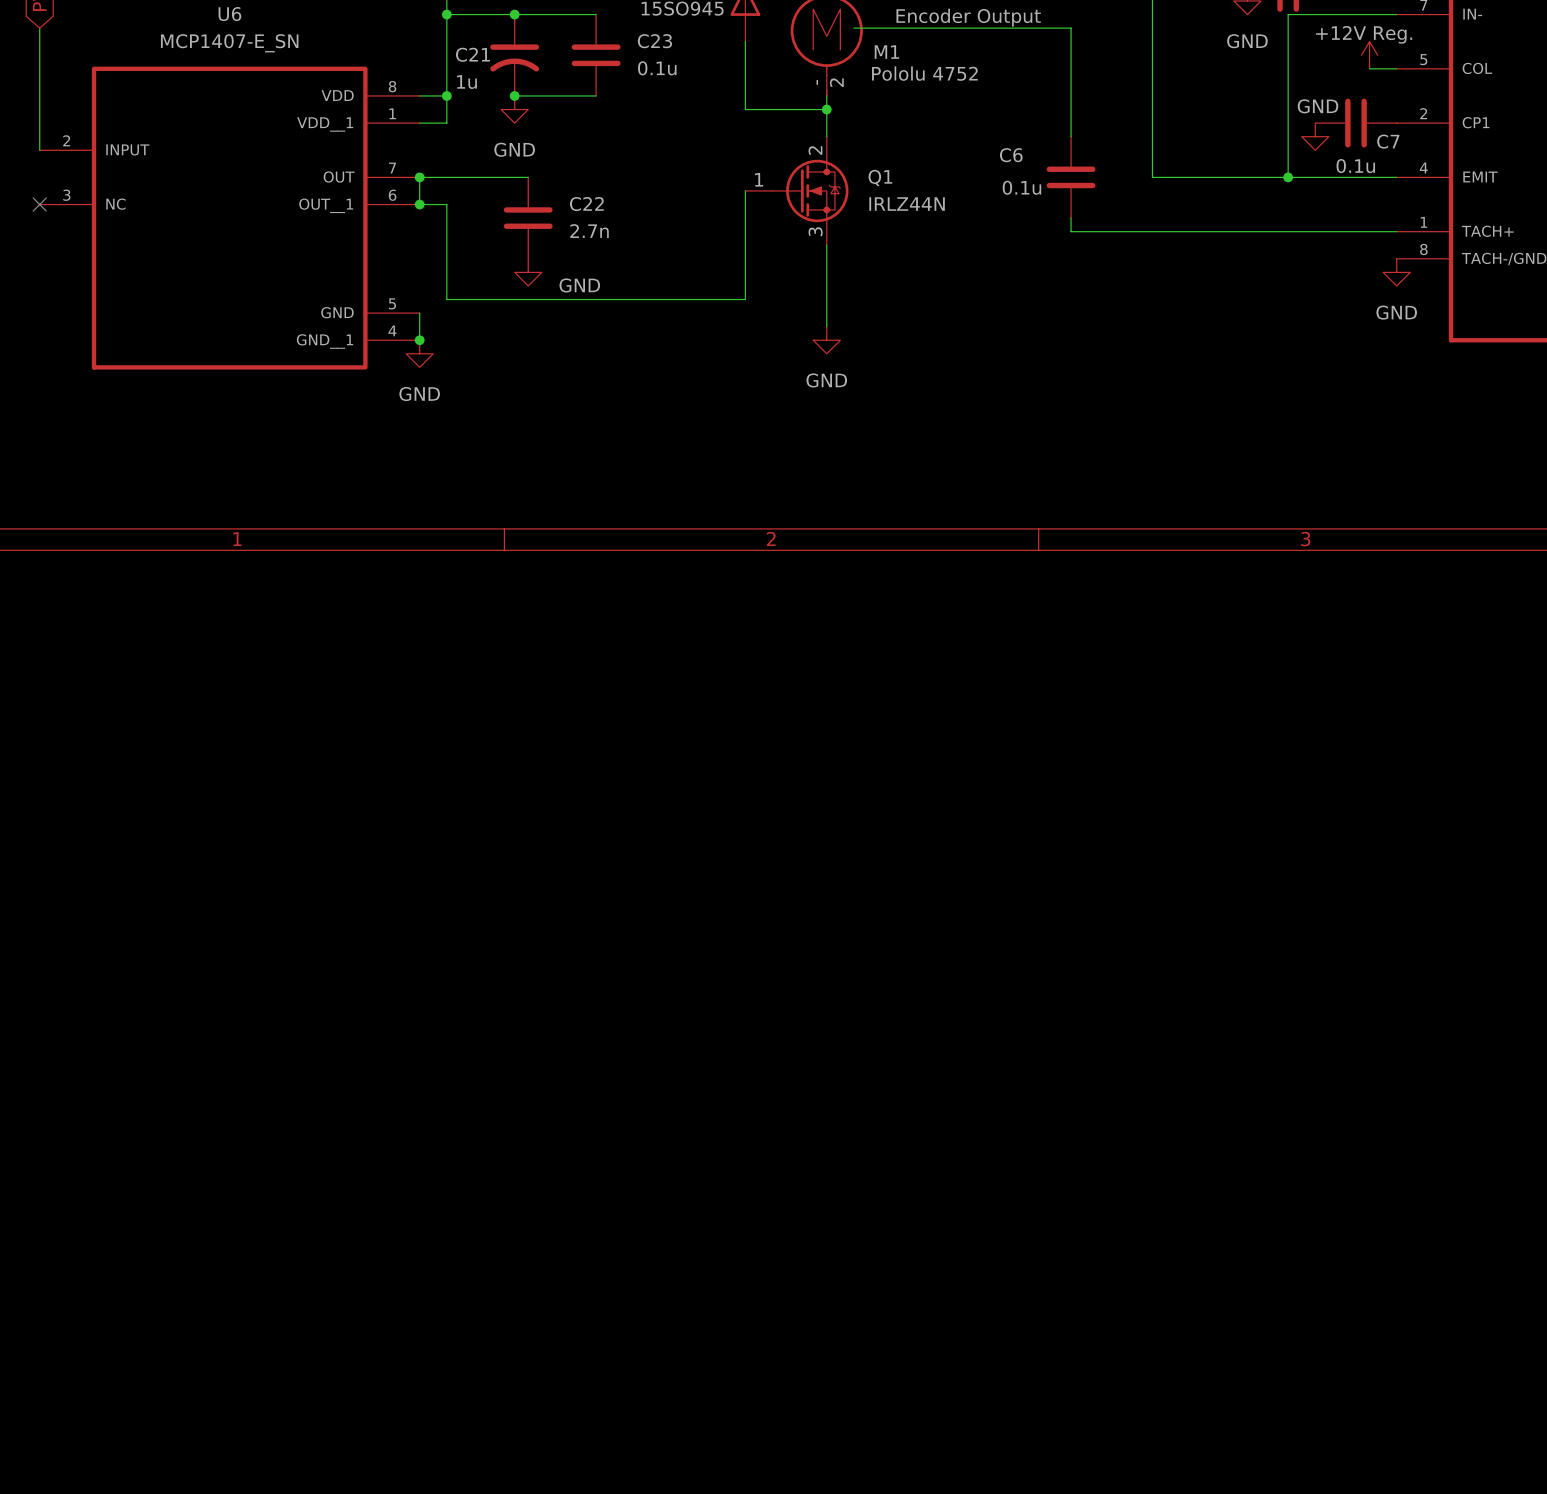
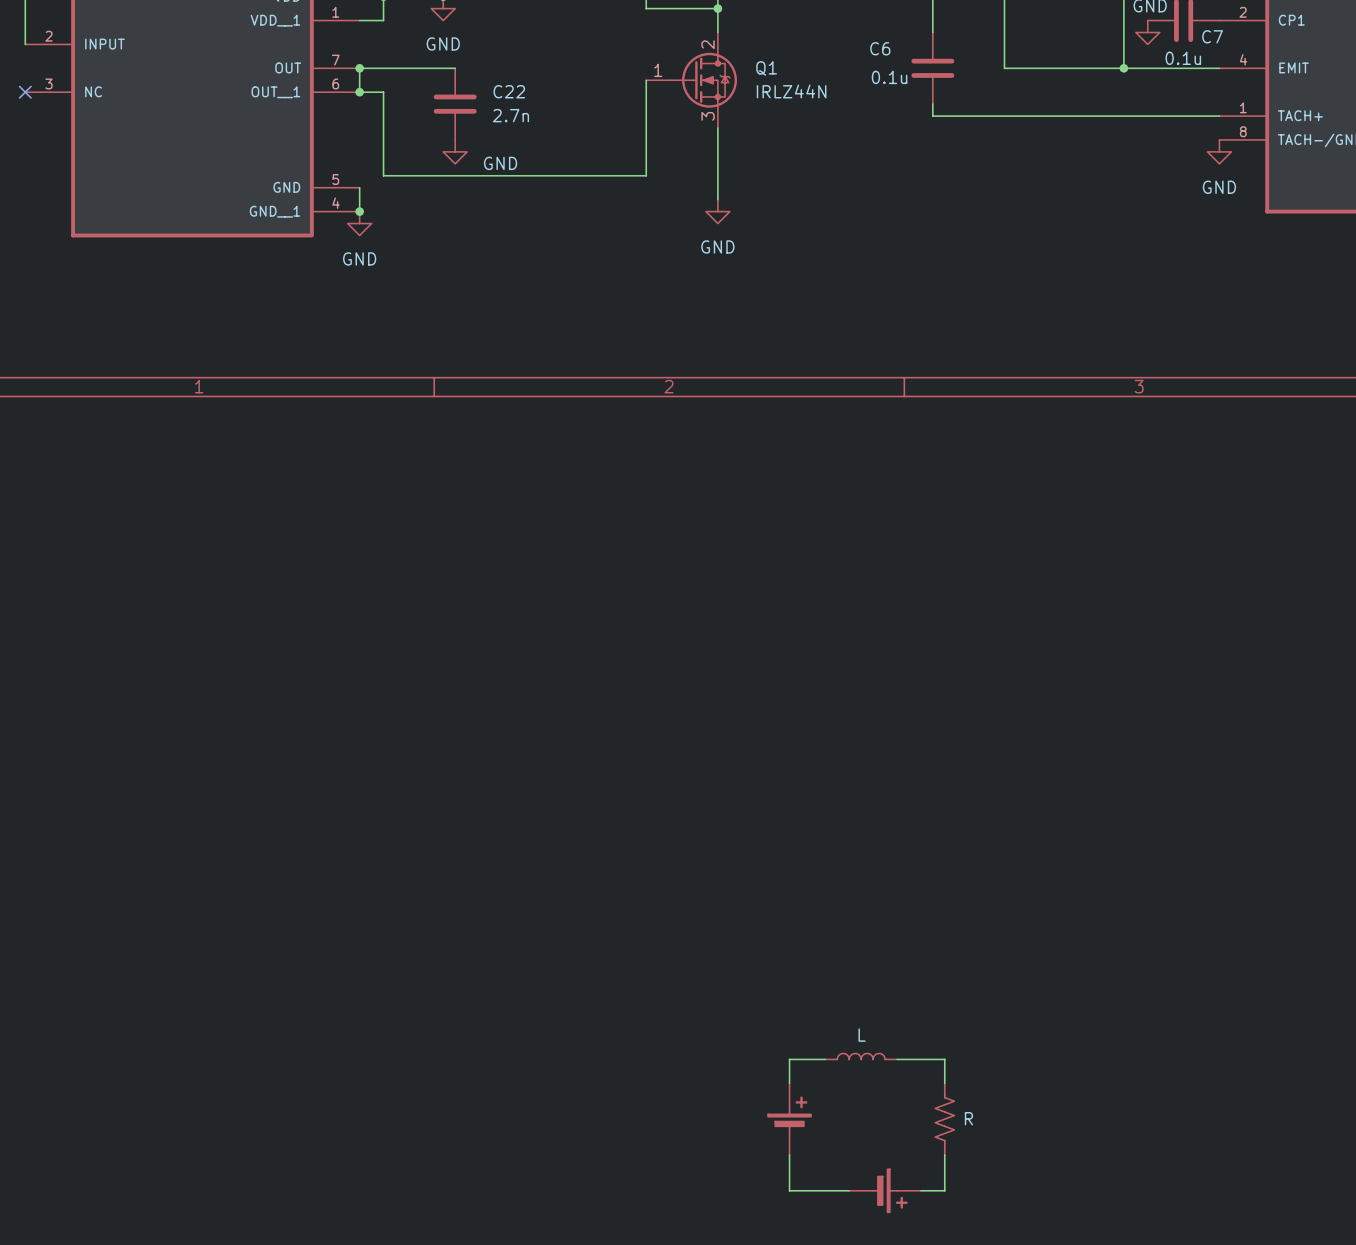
L: none -> (861, 1056)
wire: none -> (825, 1059) (789, 1059) (789, 1083)
wire: none -> (897, 1059) (944, 1059) (944, 1083)
part: none -> (789, 1119)
R: none -> (944, 1119)
wire: none -> (789, 1154) (789, 1190) (849, 1190)
wire: none -> (944, 1154) (944, 1190) (920, 1190)
part: none -> (885, 1190)

